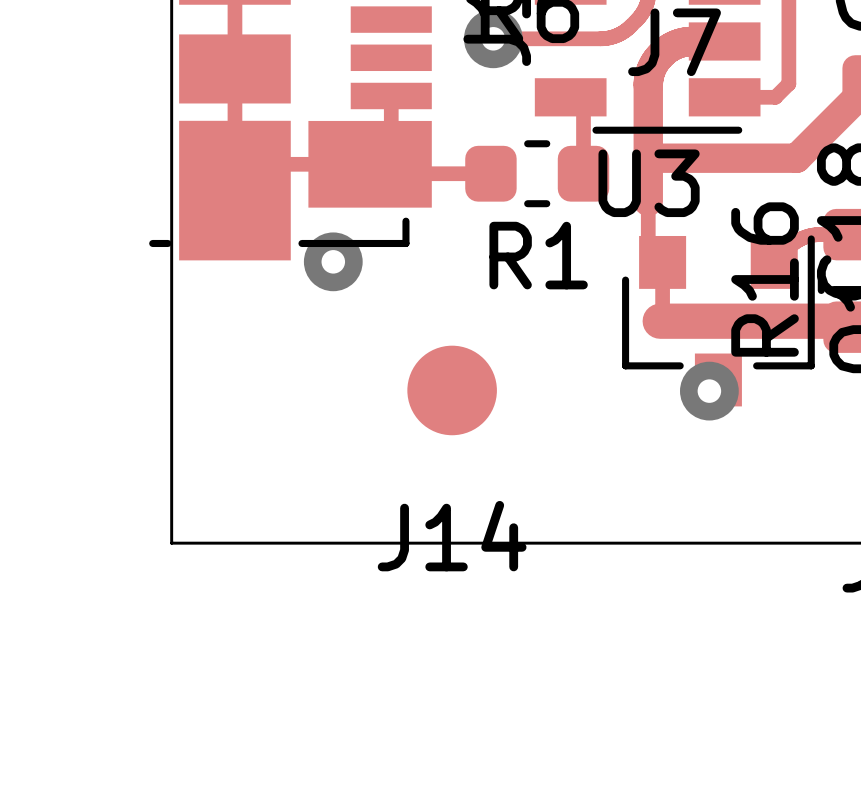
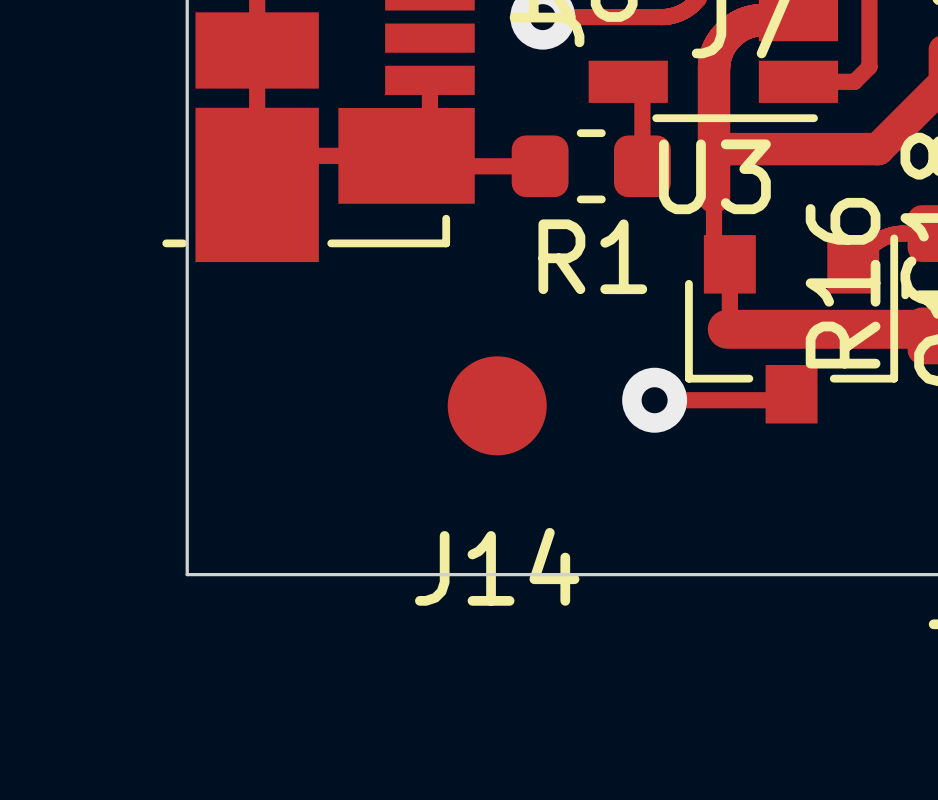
via: (333, 261) -> none
track: none -> (654, 400) (785, 400)
via position: (709, 391) -> (654, 400)

